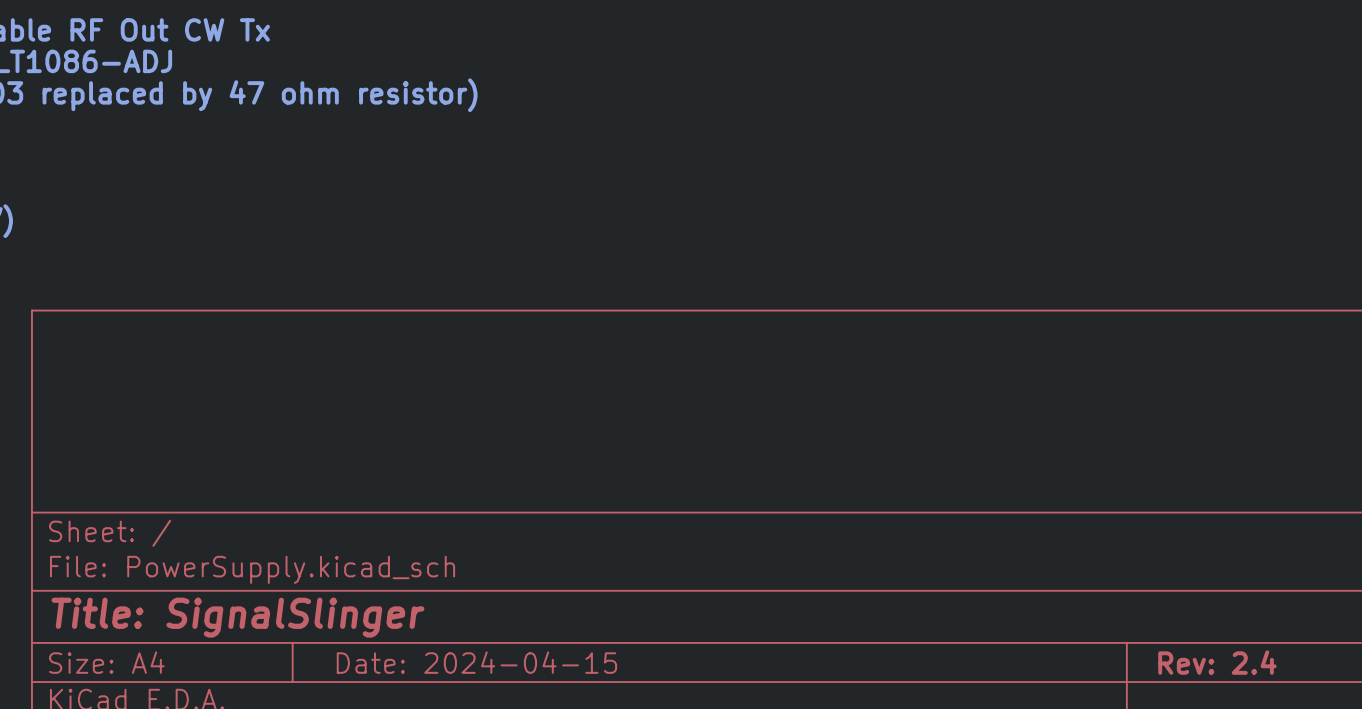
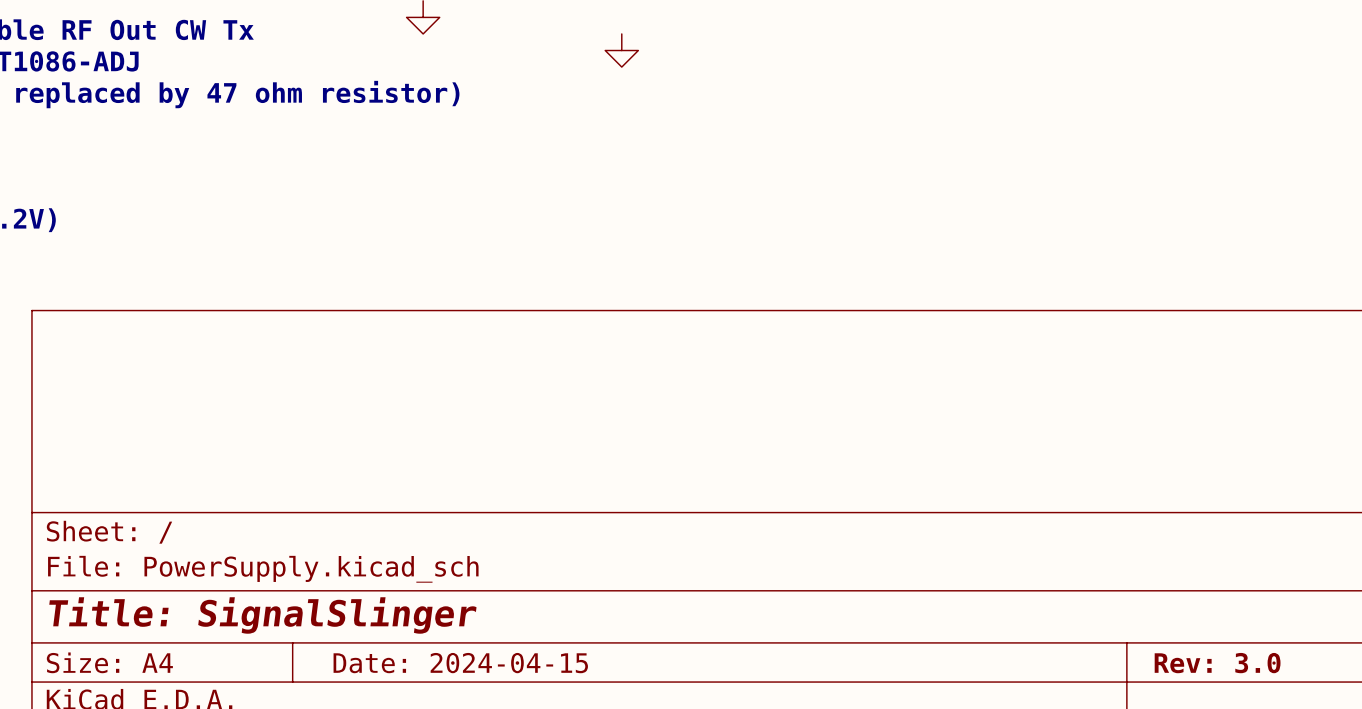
power symbol: none -> (423, 17)
power symbol: none -> (621, 50)
title block: Rev: 2.4 (1217, 662) -> Rev: 3.0 (1217, 663)

